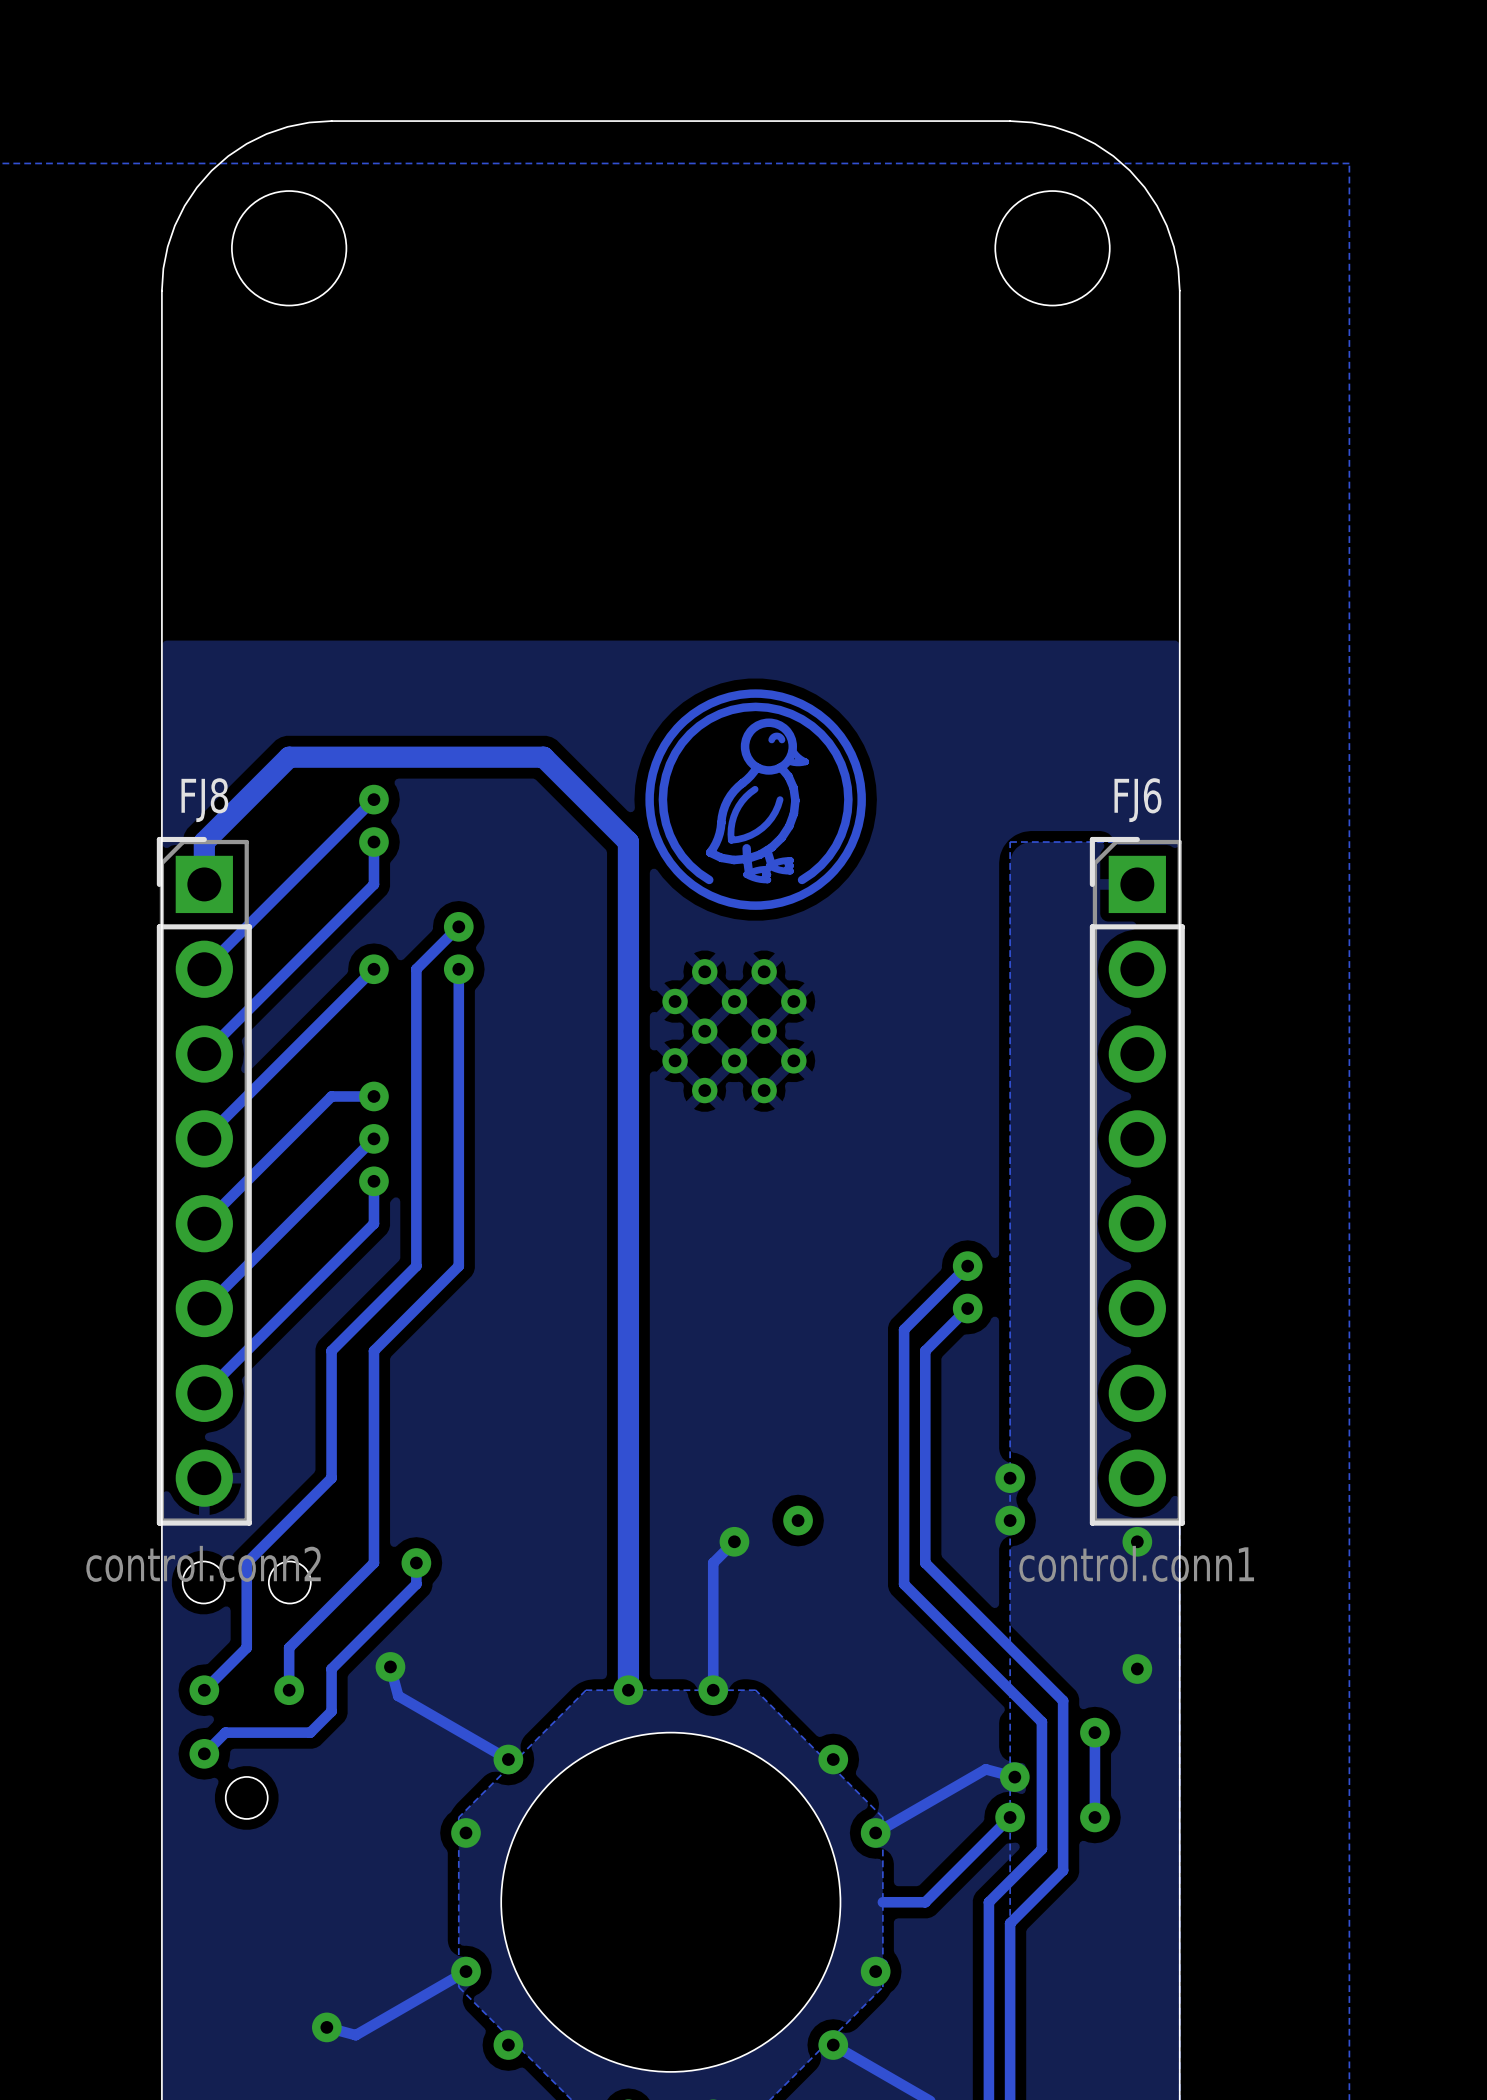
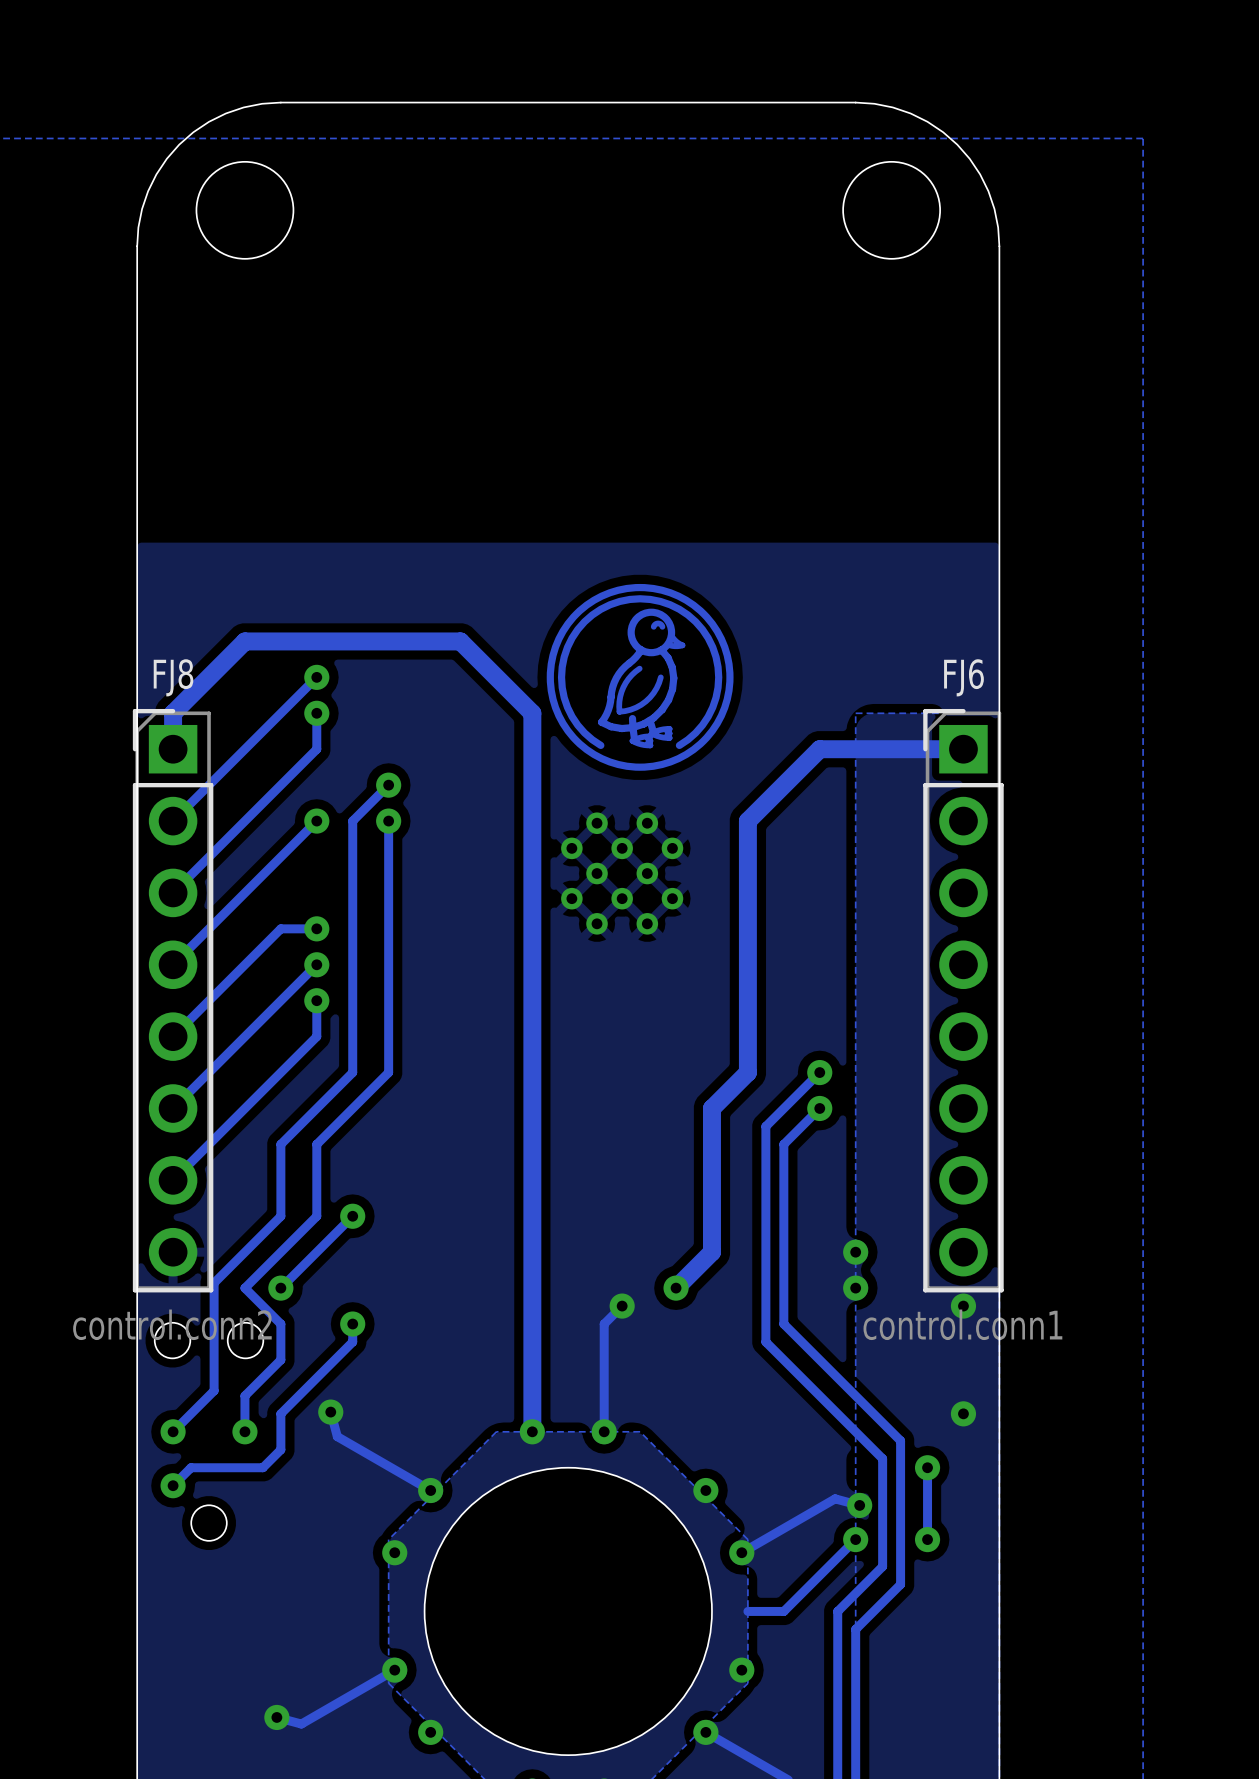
track: none -> (963, 749) (819, 749) (747, 821) (747, 1072) (711, 1108) (711, 1252) (676, 1288)
track: (331, 1435) (331, 1478) -> (316, 1216) (280, 1252)
track: (373, 1435) (373, 1562) (331, 1605) -> (244, 1288) (280, 1324) (280, 1359)
track: none -> (352, 1216) (280, 1288)
via: none -> (352, 1216)
track: (289, 1520) (246, 1562) (246, 1647) -> (280, 1216) (214, 1283) (214, 1390) (209, 1395)
via: none -> (280, 1288)

